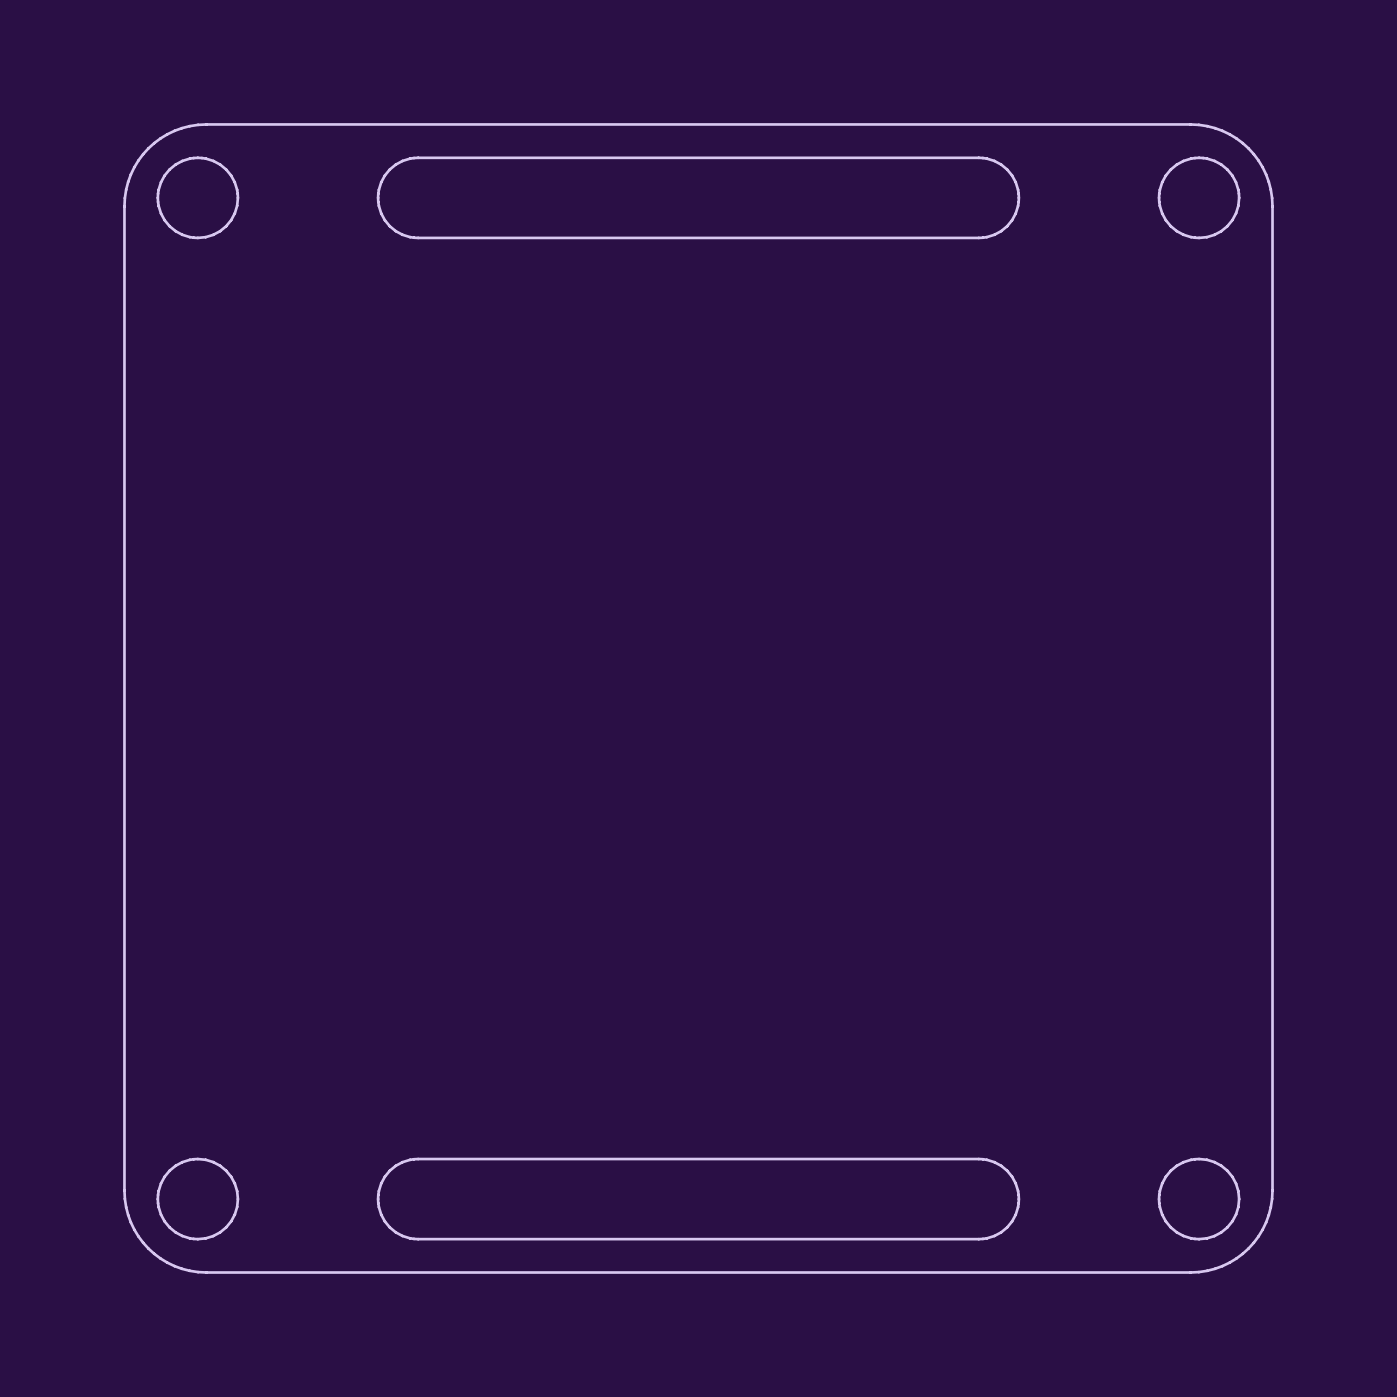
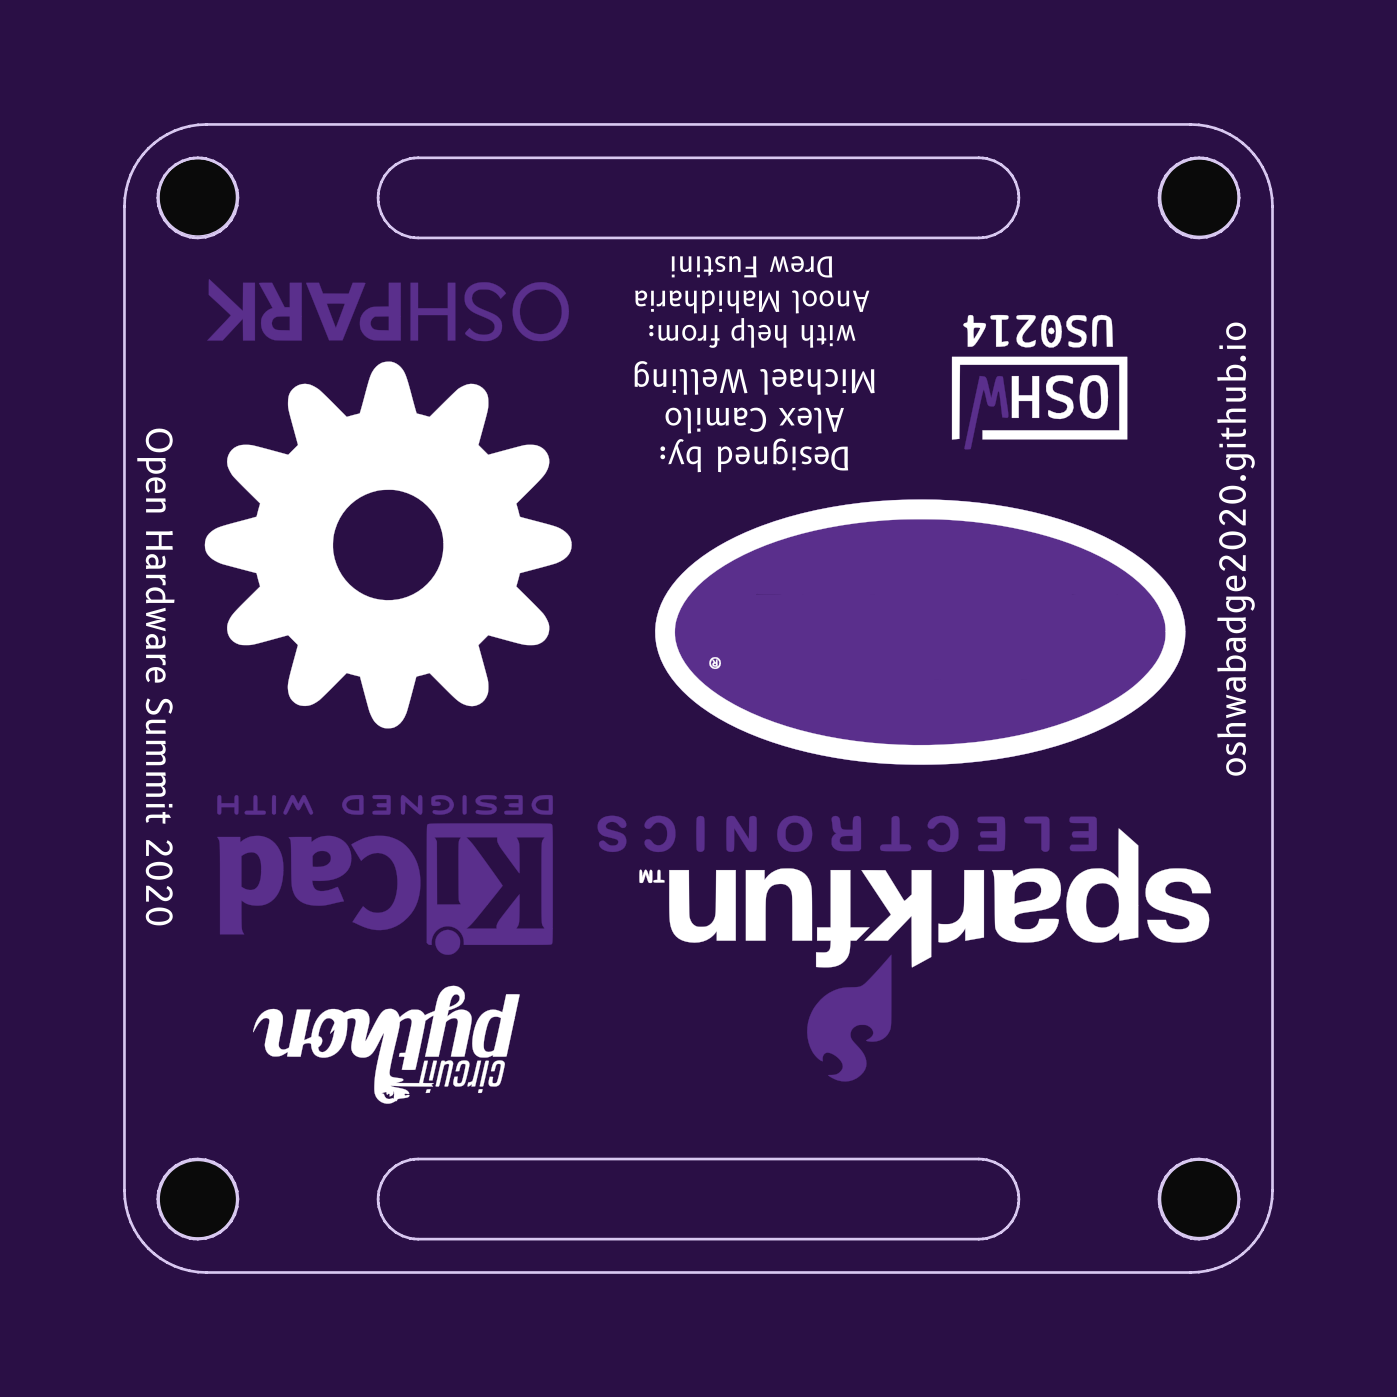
part: none -> (197, 197)
part: none -> (1199, 197)
text: none -> Drew Fustini (752, 266)
drawing: none -> [204, 278, 1211, 1104]
text: none -> Anool Mahidharia (752, 301)
text: none -> with help from: (752, 332)
text: none -> Michael Welling (754, 377)
text: none -> Alex Camilo (754, 420)
text: none -> Designed by: (754, 455)
text: none -> oshwabadge2020.github.io (1236, 549)
text: none -> Open Hardware Summit 2020 (155, 676)
part: none -> (1199, 1198)
part: none -> (197, 1199)

